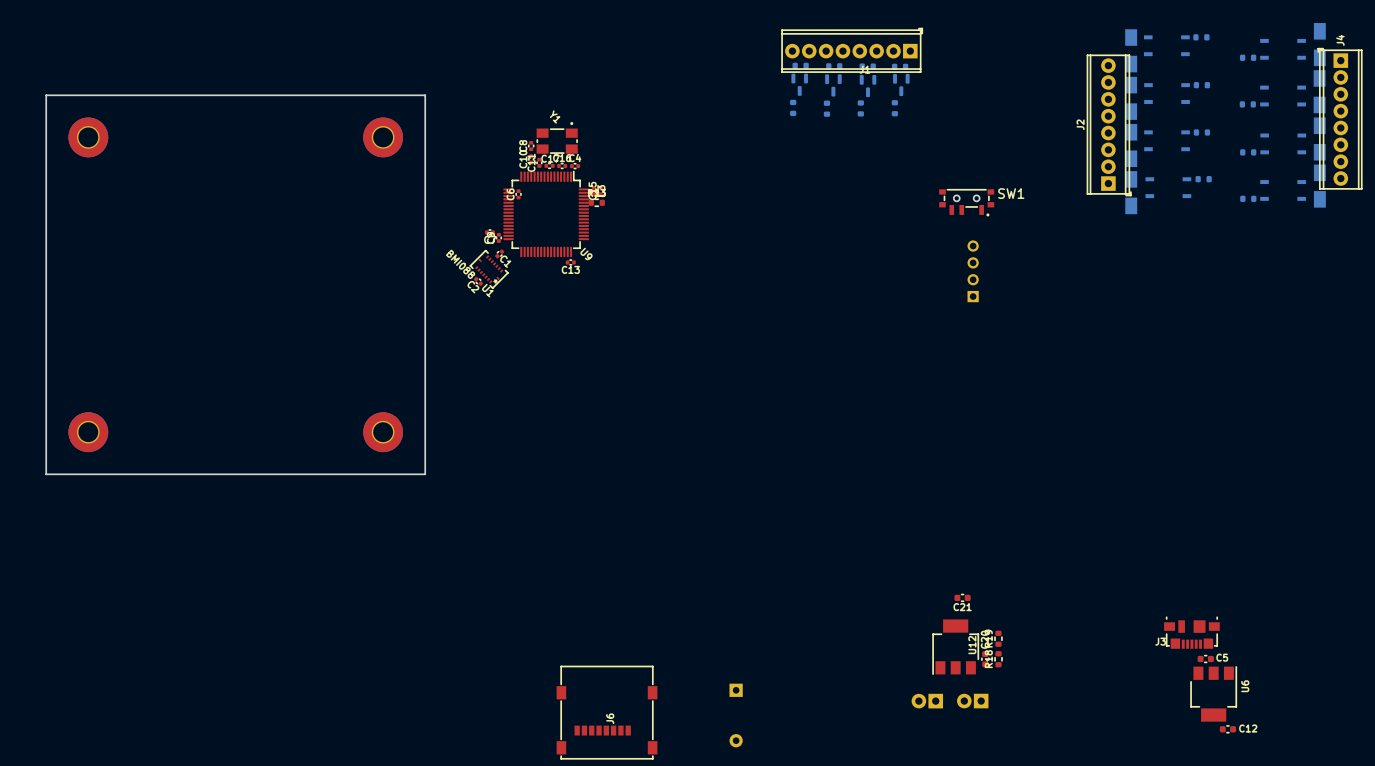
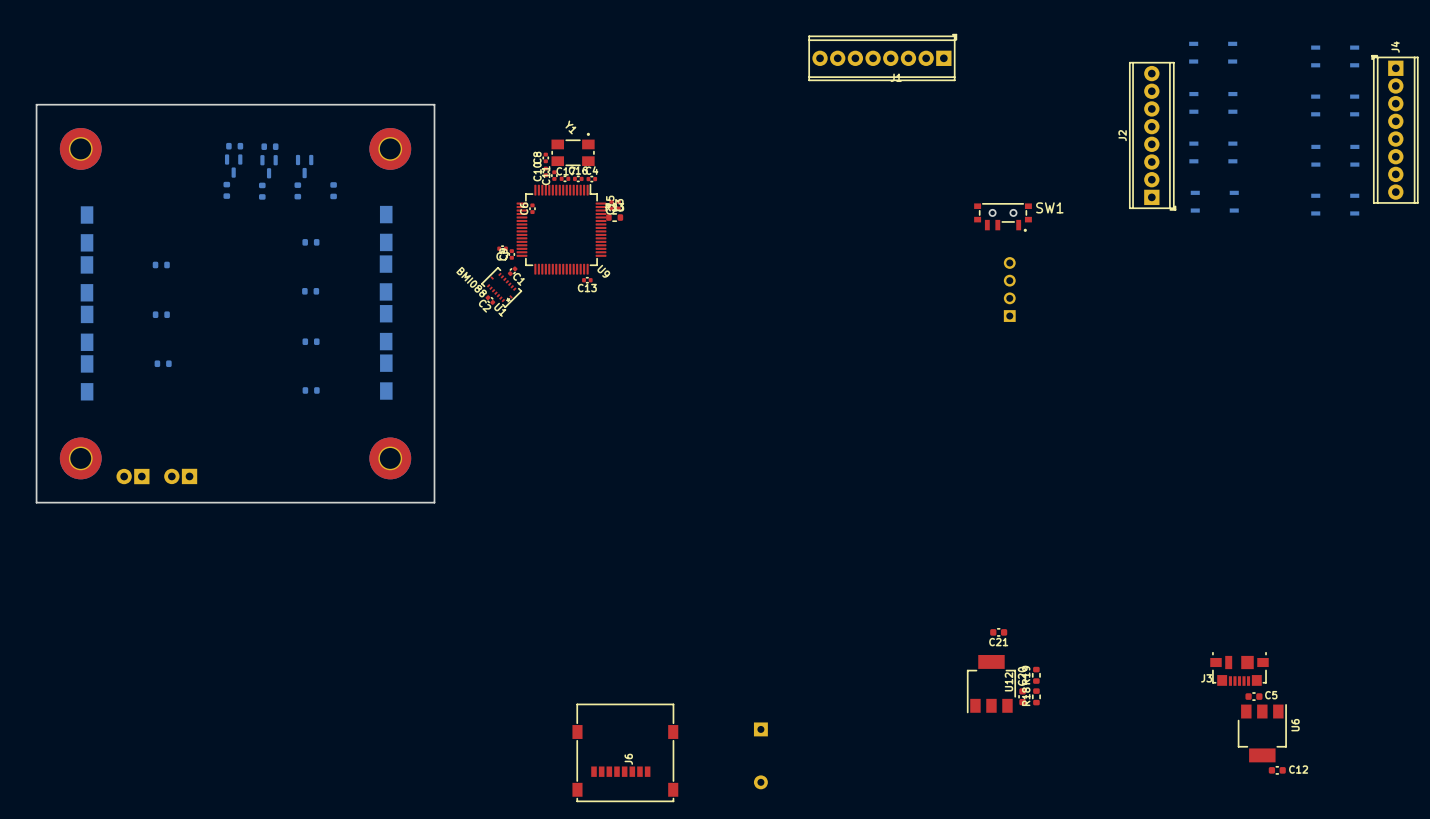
part: (1201, 37) -> none
part: (1319, 44) -> none
part: (1131, 50) -> none
part: (1248, 57) -> none
part: (800, 65) -> none
part: (834, 66) -> none
part: (867, 66) -> none
part: (900, 66) -> none
part: (799, 84) -> none
part: (833, 85) -> none
part: (901, 85) -> none
part: (1201, 85) -> none
part: (868, 86) -> none
part: (1319, 91) -> none
part: (1131, 98) -> none
part: (1247, 104) -> none
part: (793, 107) -> none
part: (826, 108) -> none
part: (860, 108) -> none
part: (894, 108) -> none
part: (1201, 132) -> none
part: none -> (234, 146)
part: none -> (269, 146)
part: (1319, 139) -> none
part: (1131, 145) -> none
part: (1248, 152) -> none
part: none -> (233, 166)
part: none -> (269, 166)
part: none -> (304, 166)
part: none -> (226, 190)
part: none -> (262, 191)
part: none -> (297, 190)
part: none -> (333, 190)
part: (1203, 179) -> none
part: (1319, 186) -> none
part: (1131, 192) -> none
part: (1248, 198) -> none
part: none -> (87, 228)
part: none -> (386, 228)
part: none -> (310, 242)
part: none -> (161, 264)
part: none -> (386, 278)
part: none -> (86, 278)
part: none -> (310, 291)
part: none -> (161, 314)
part: none -> (386, 327)
part: none -> (87, 328)
part: none -> (311, 341)
part: none -> (163, 363)
part: none -> (386, 377)
part: none -> (87, 377)
part: none -> (311, 390)
part: none -> (132, 476)
part: none -> (180, 476)
part: (927, 701) -> none
part: (972, 701) -> none

